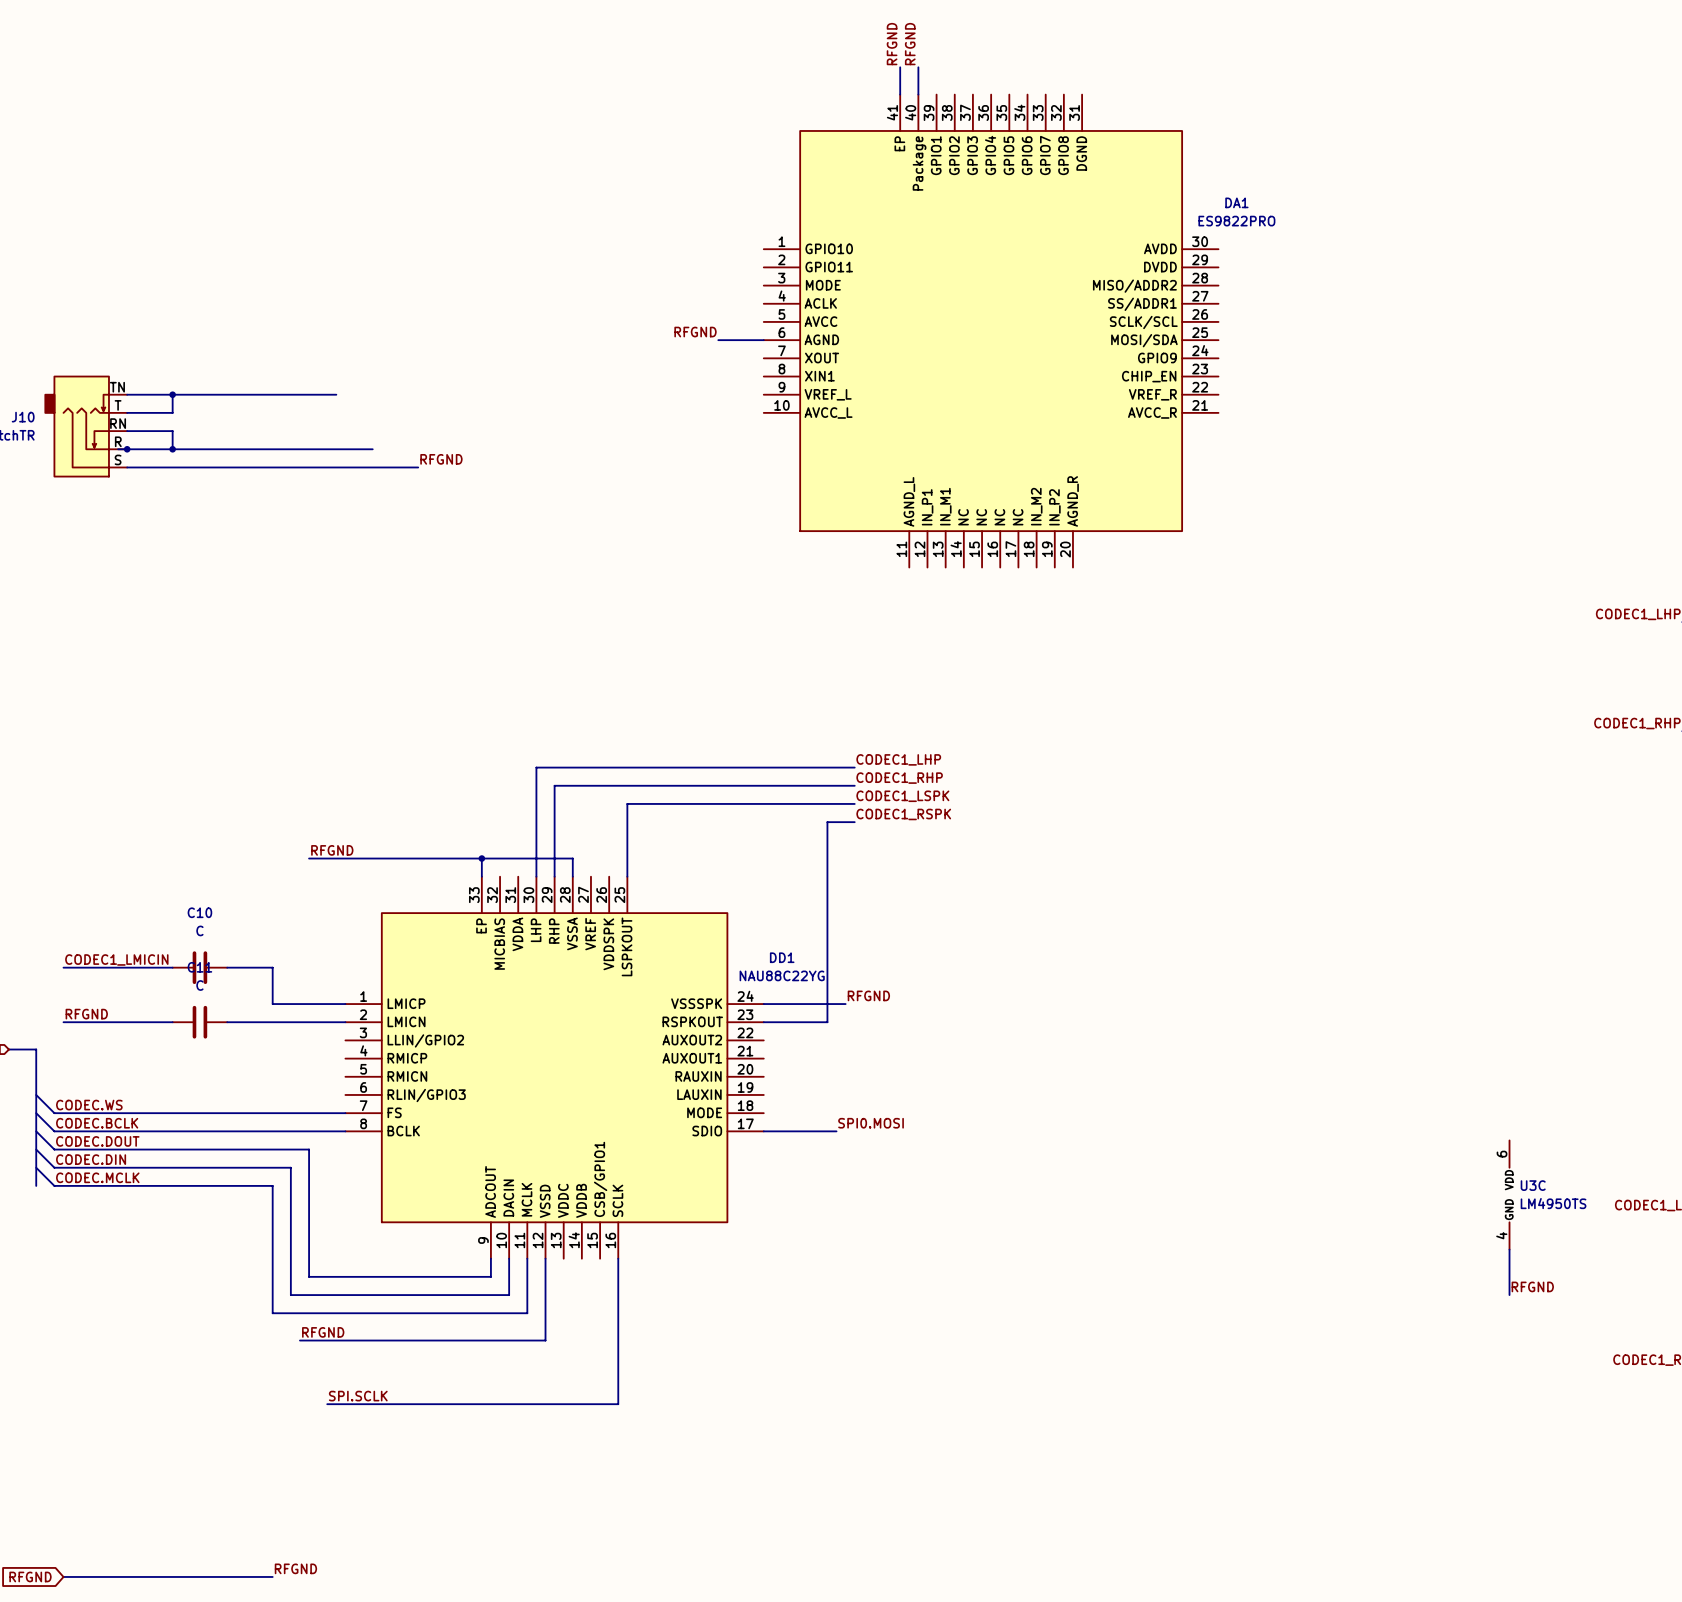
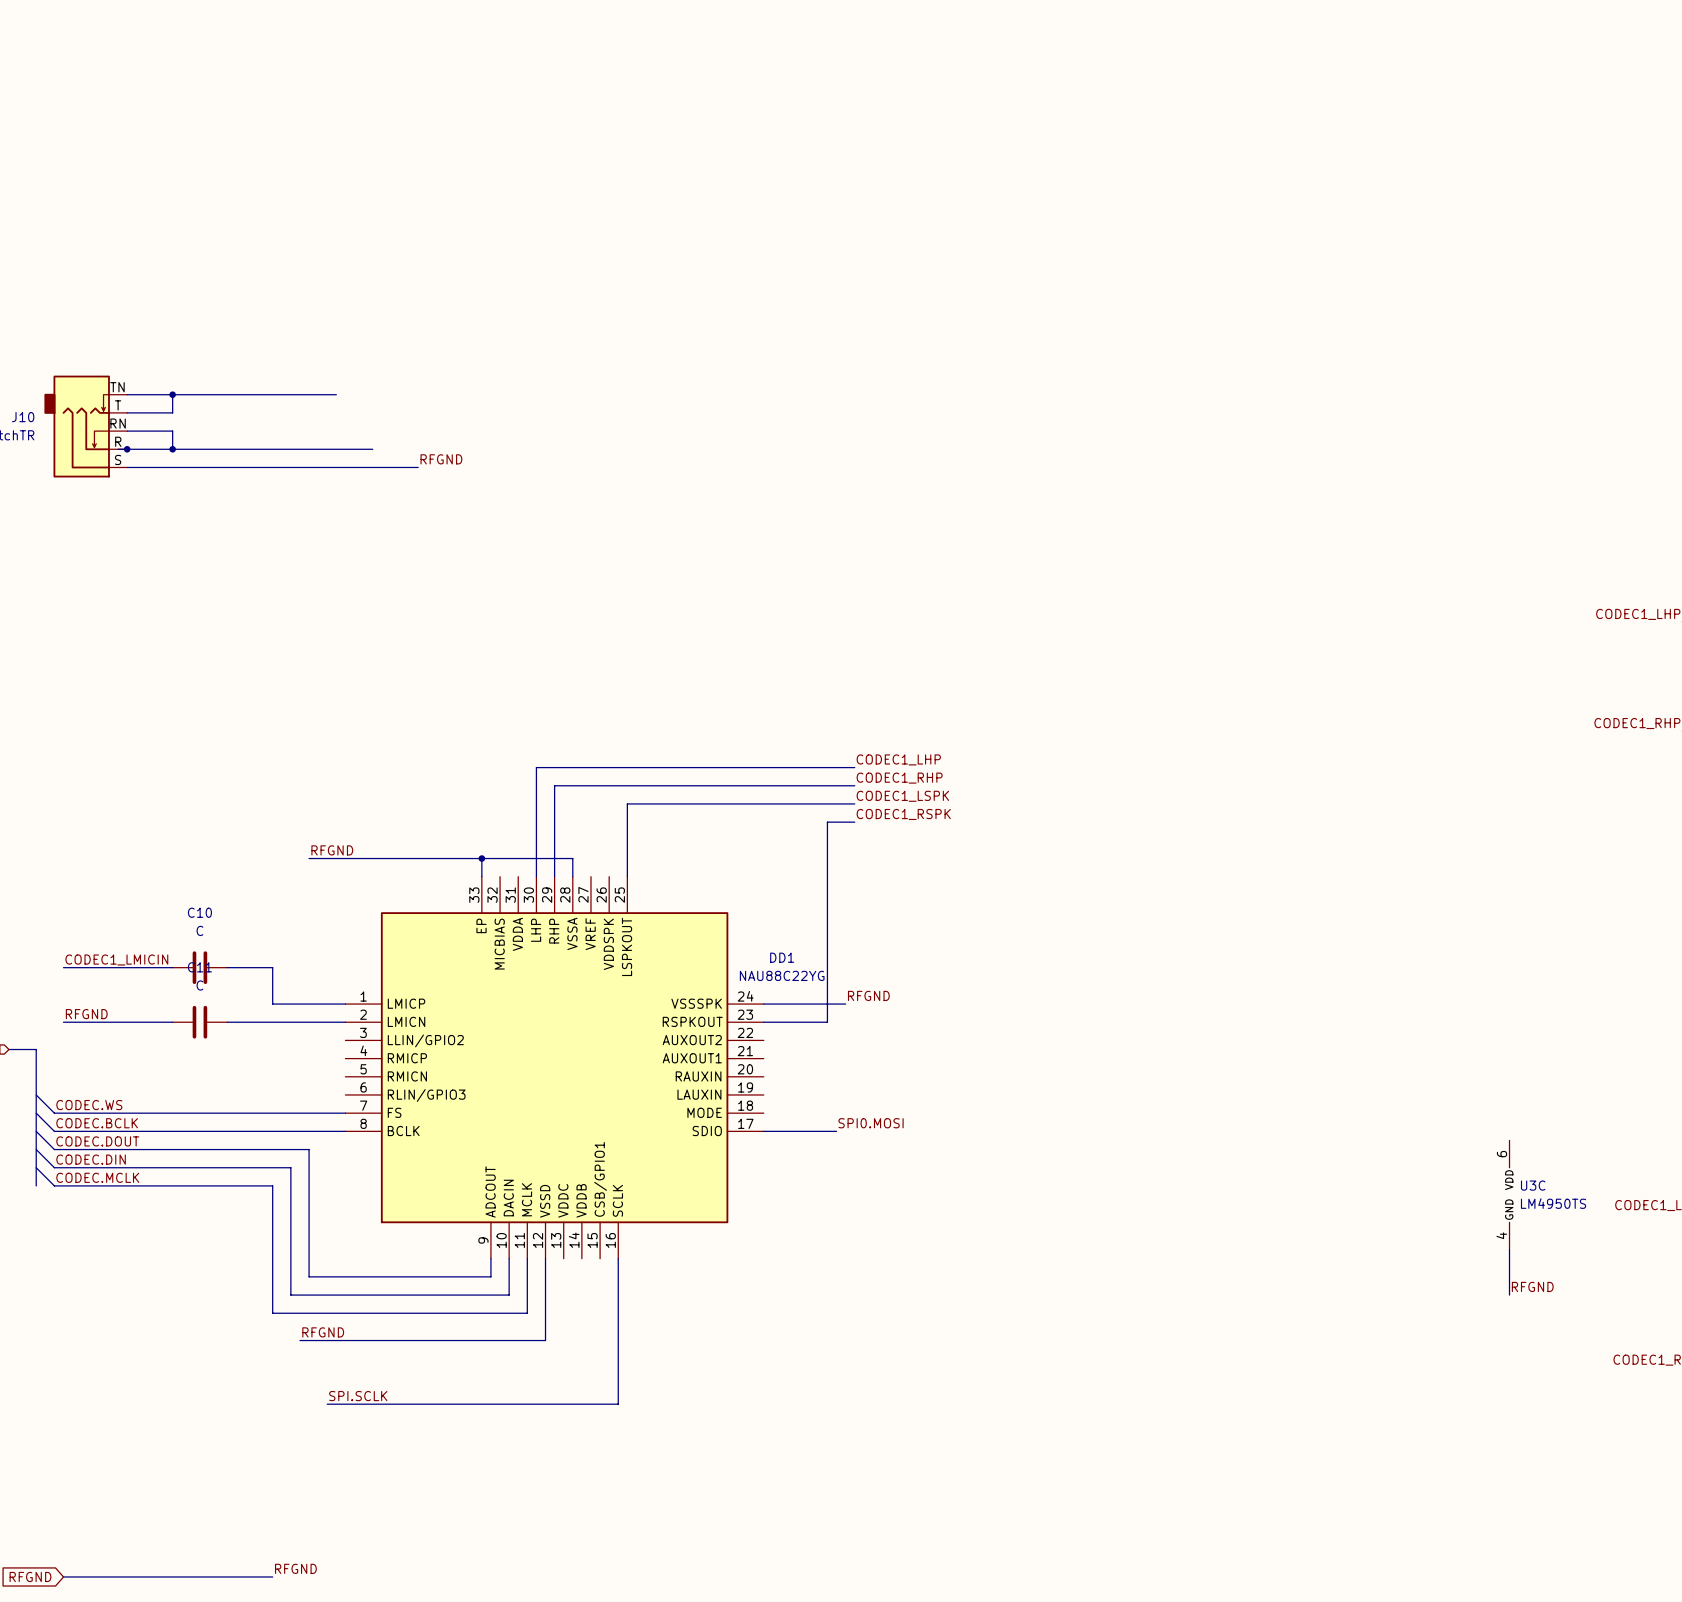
label: RFGND (892, 44) -> none
label: RFGND (910, 44) -> none
wire: (900, 67) (900, 94) -> none
wire: (918, 67) (918, 94) -> none
DA1: ES9822PRO (991, 331) -> none
label: RFGND (695, 332) -> none
wire: (718, 340) (763, 340) -> none

